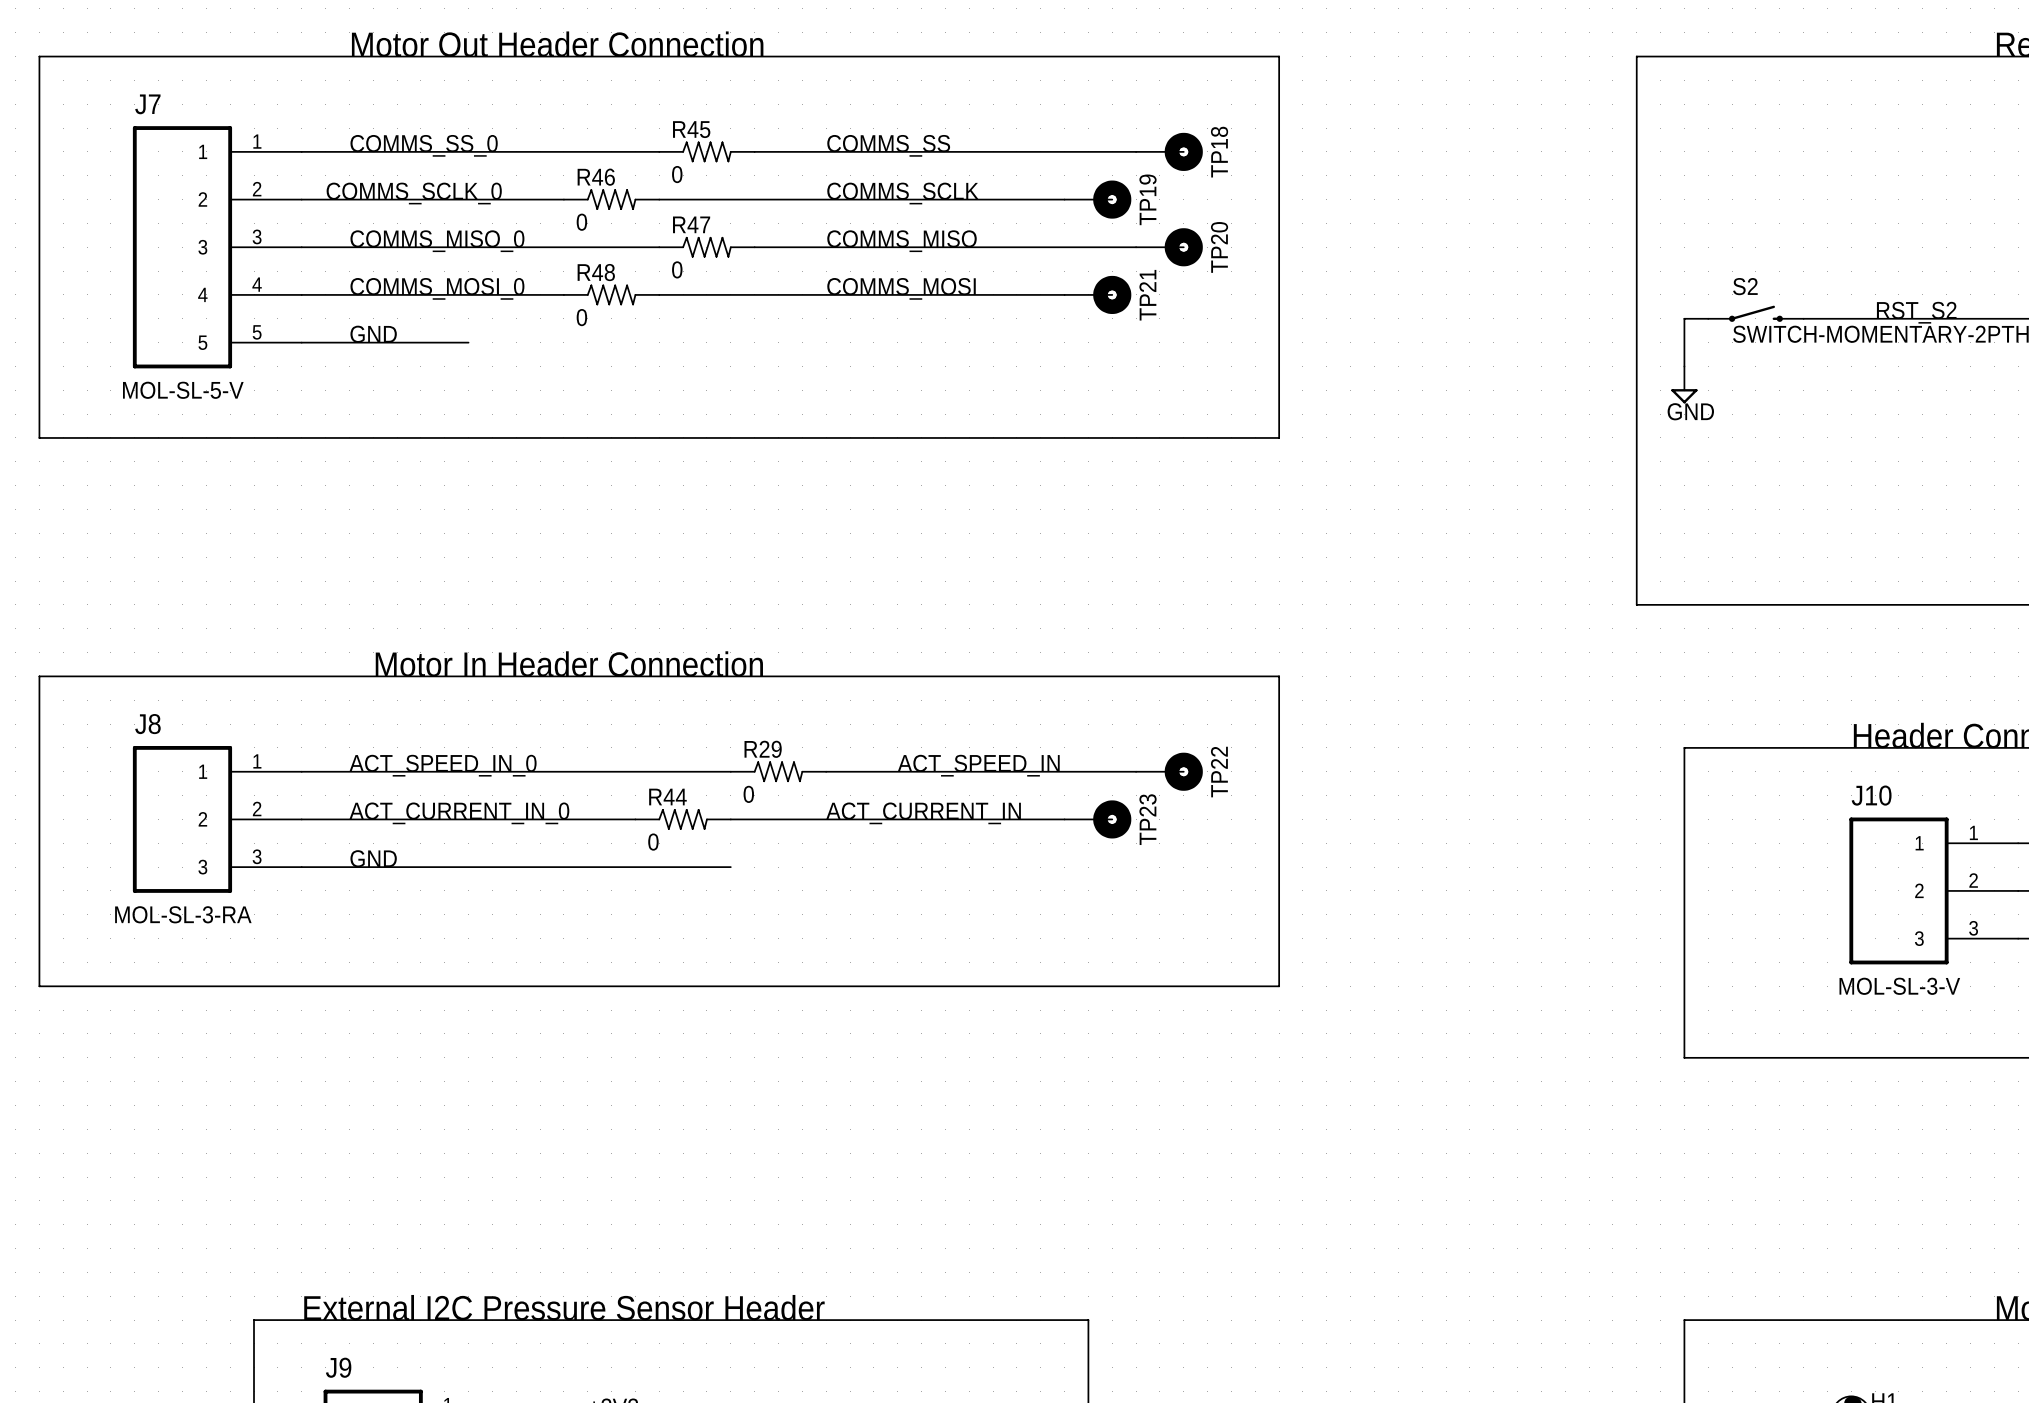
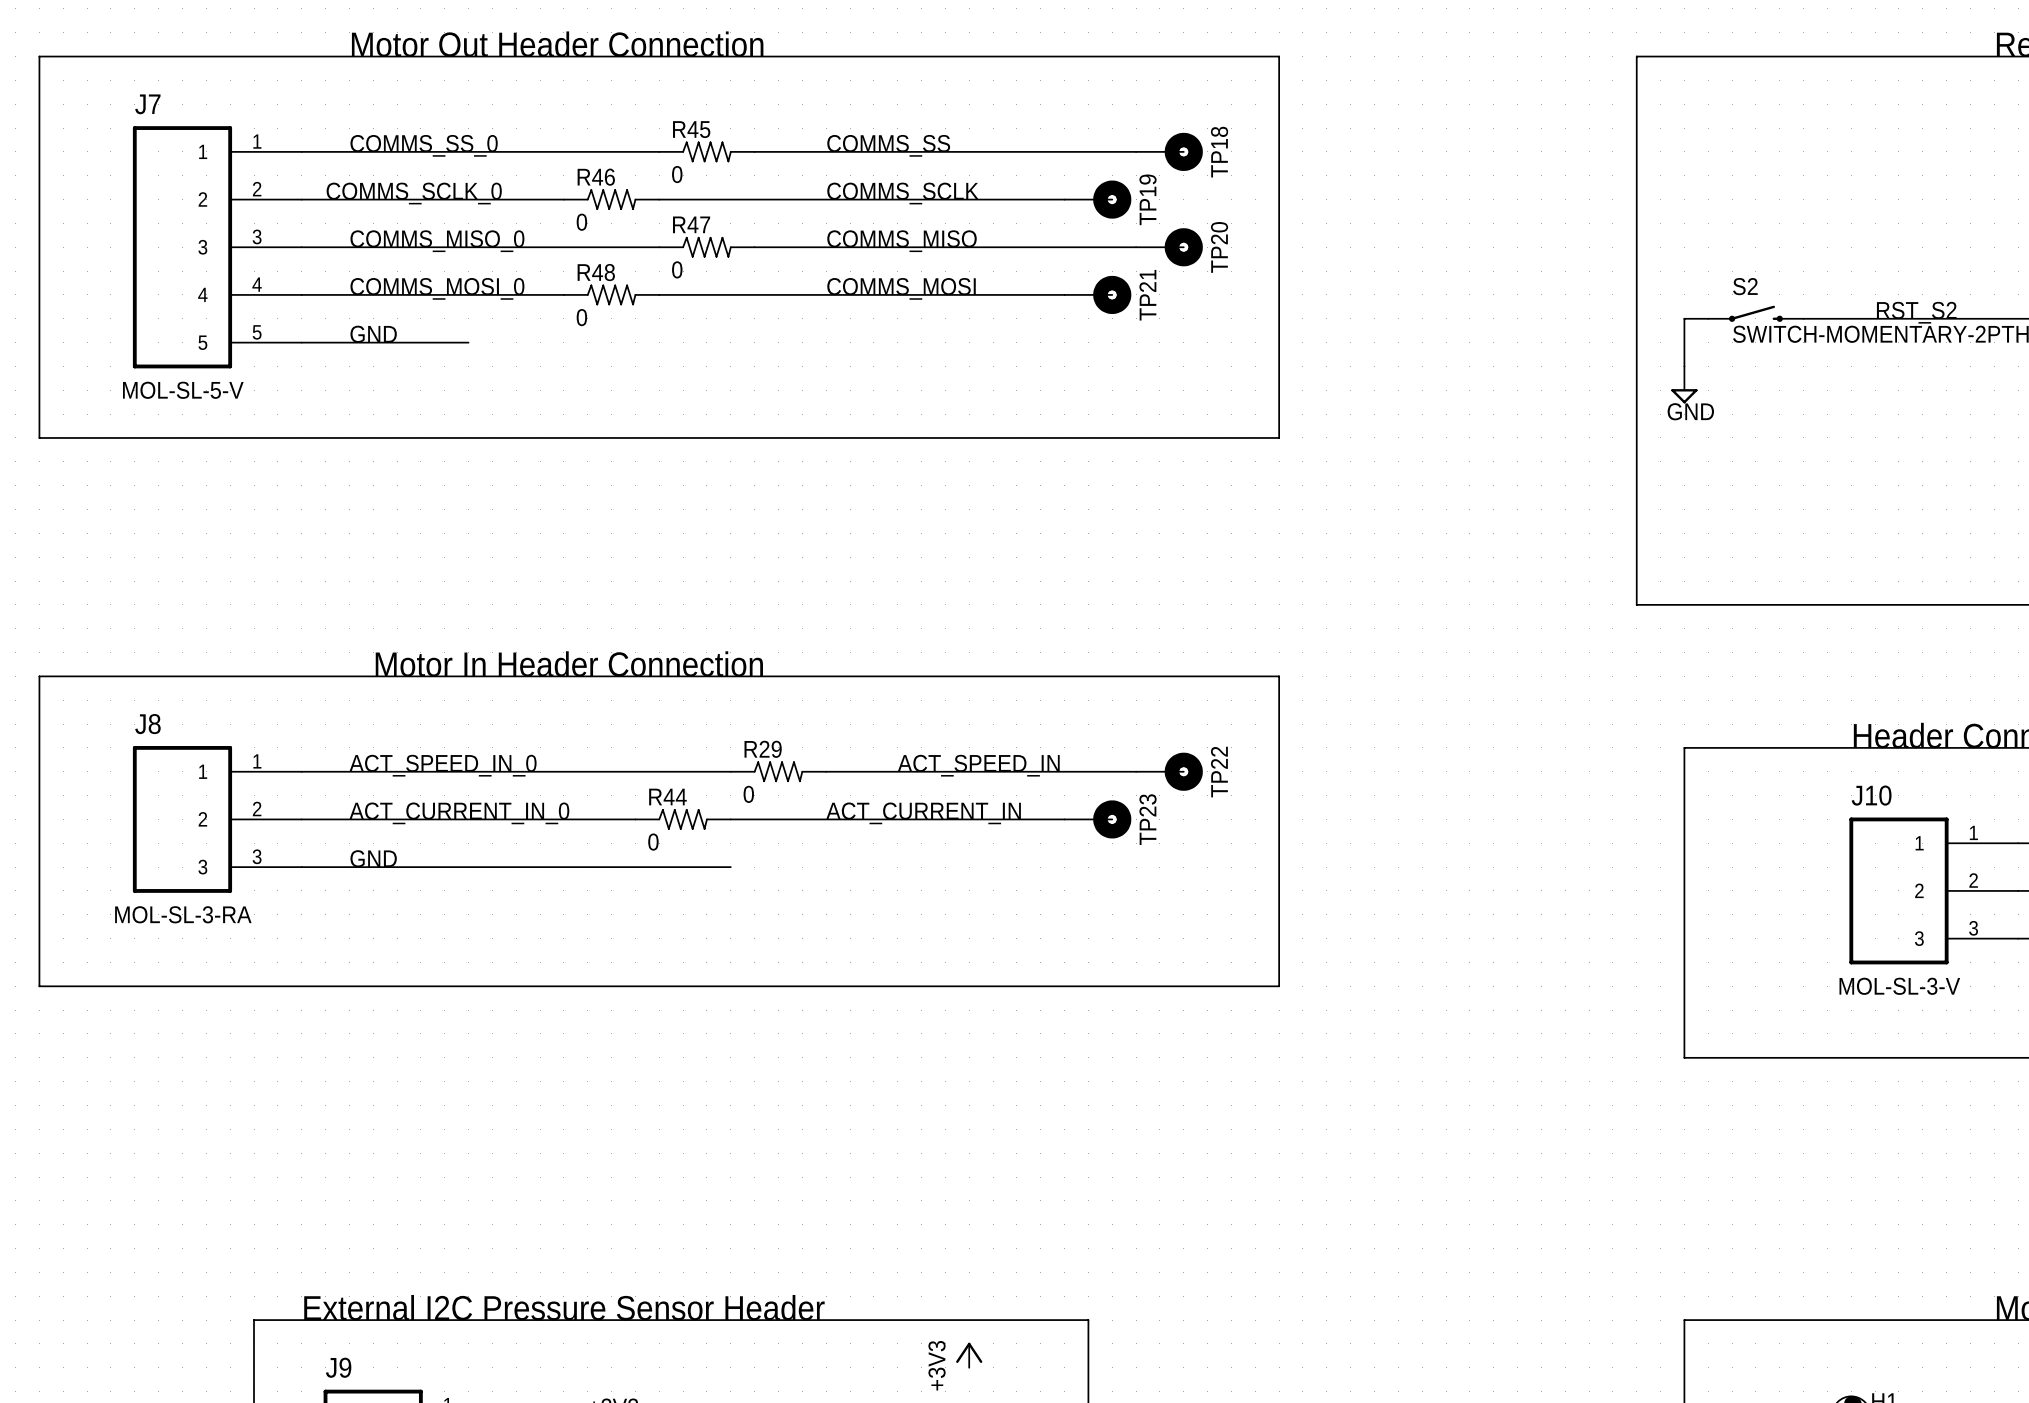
power symbol: none -> +3V3 (969, 1355)

